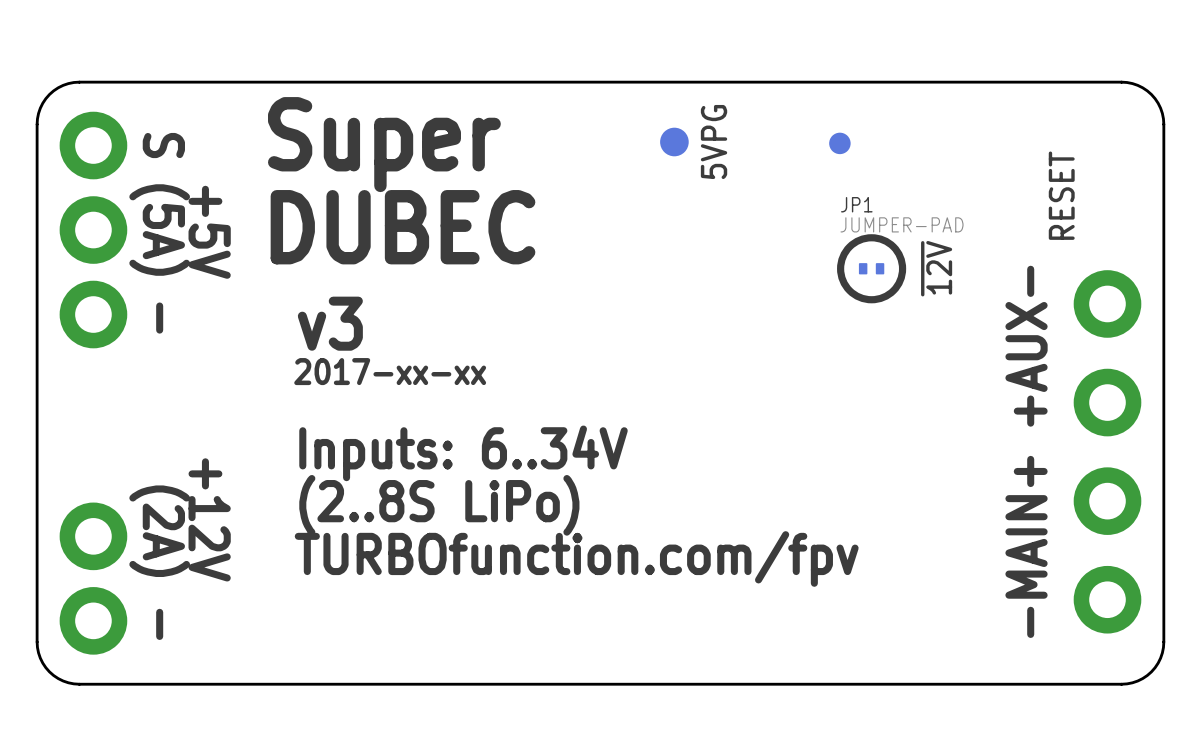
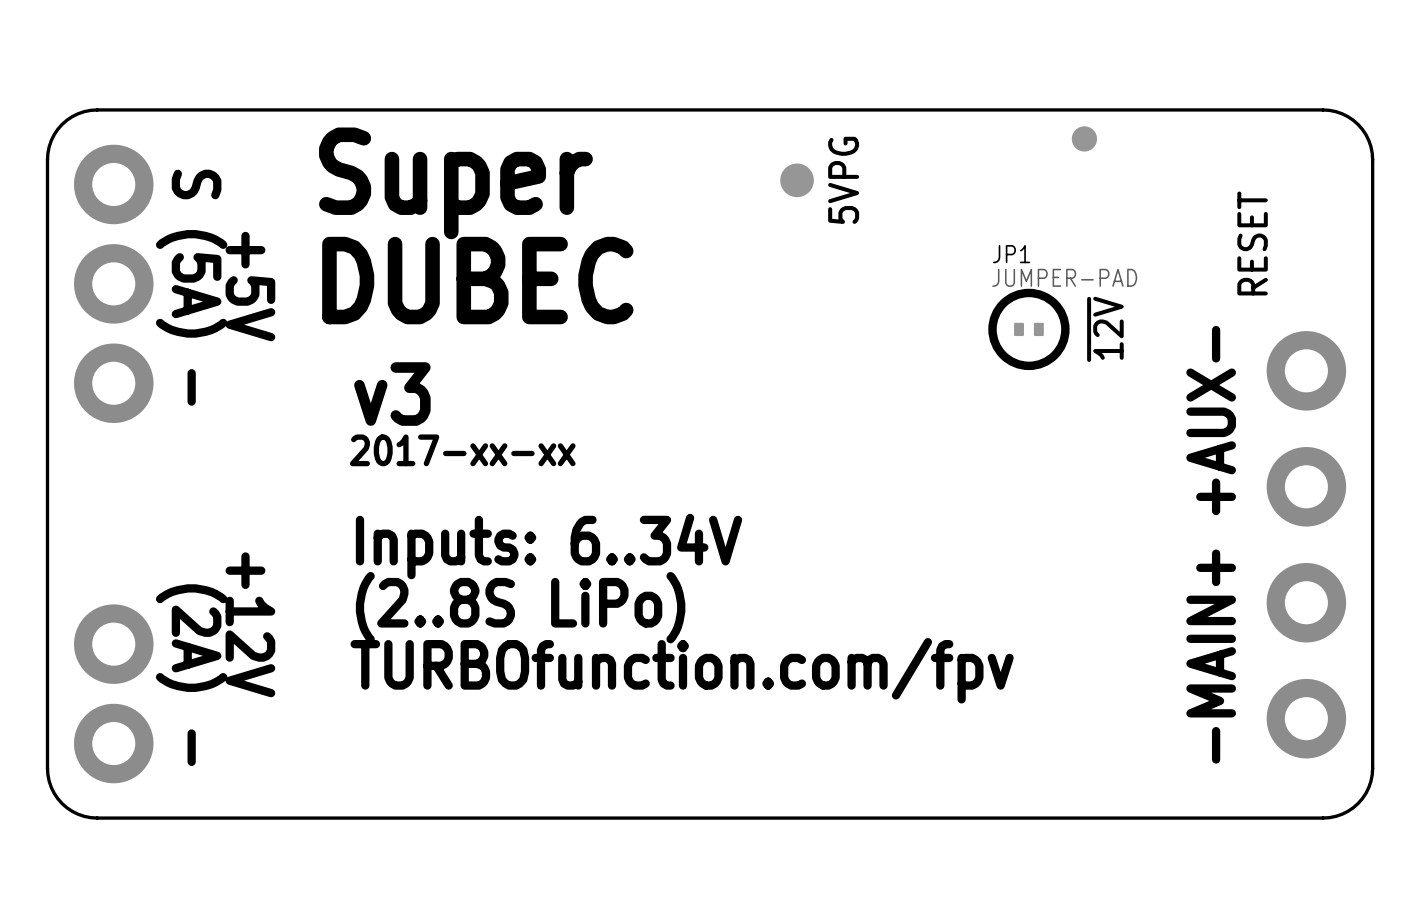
part position: (839, 143) -> (1084, 138)

